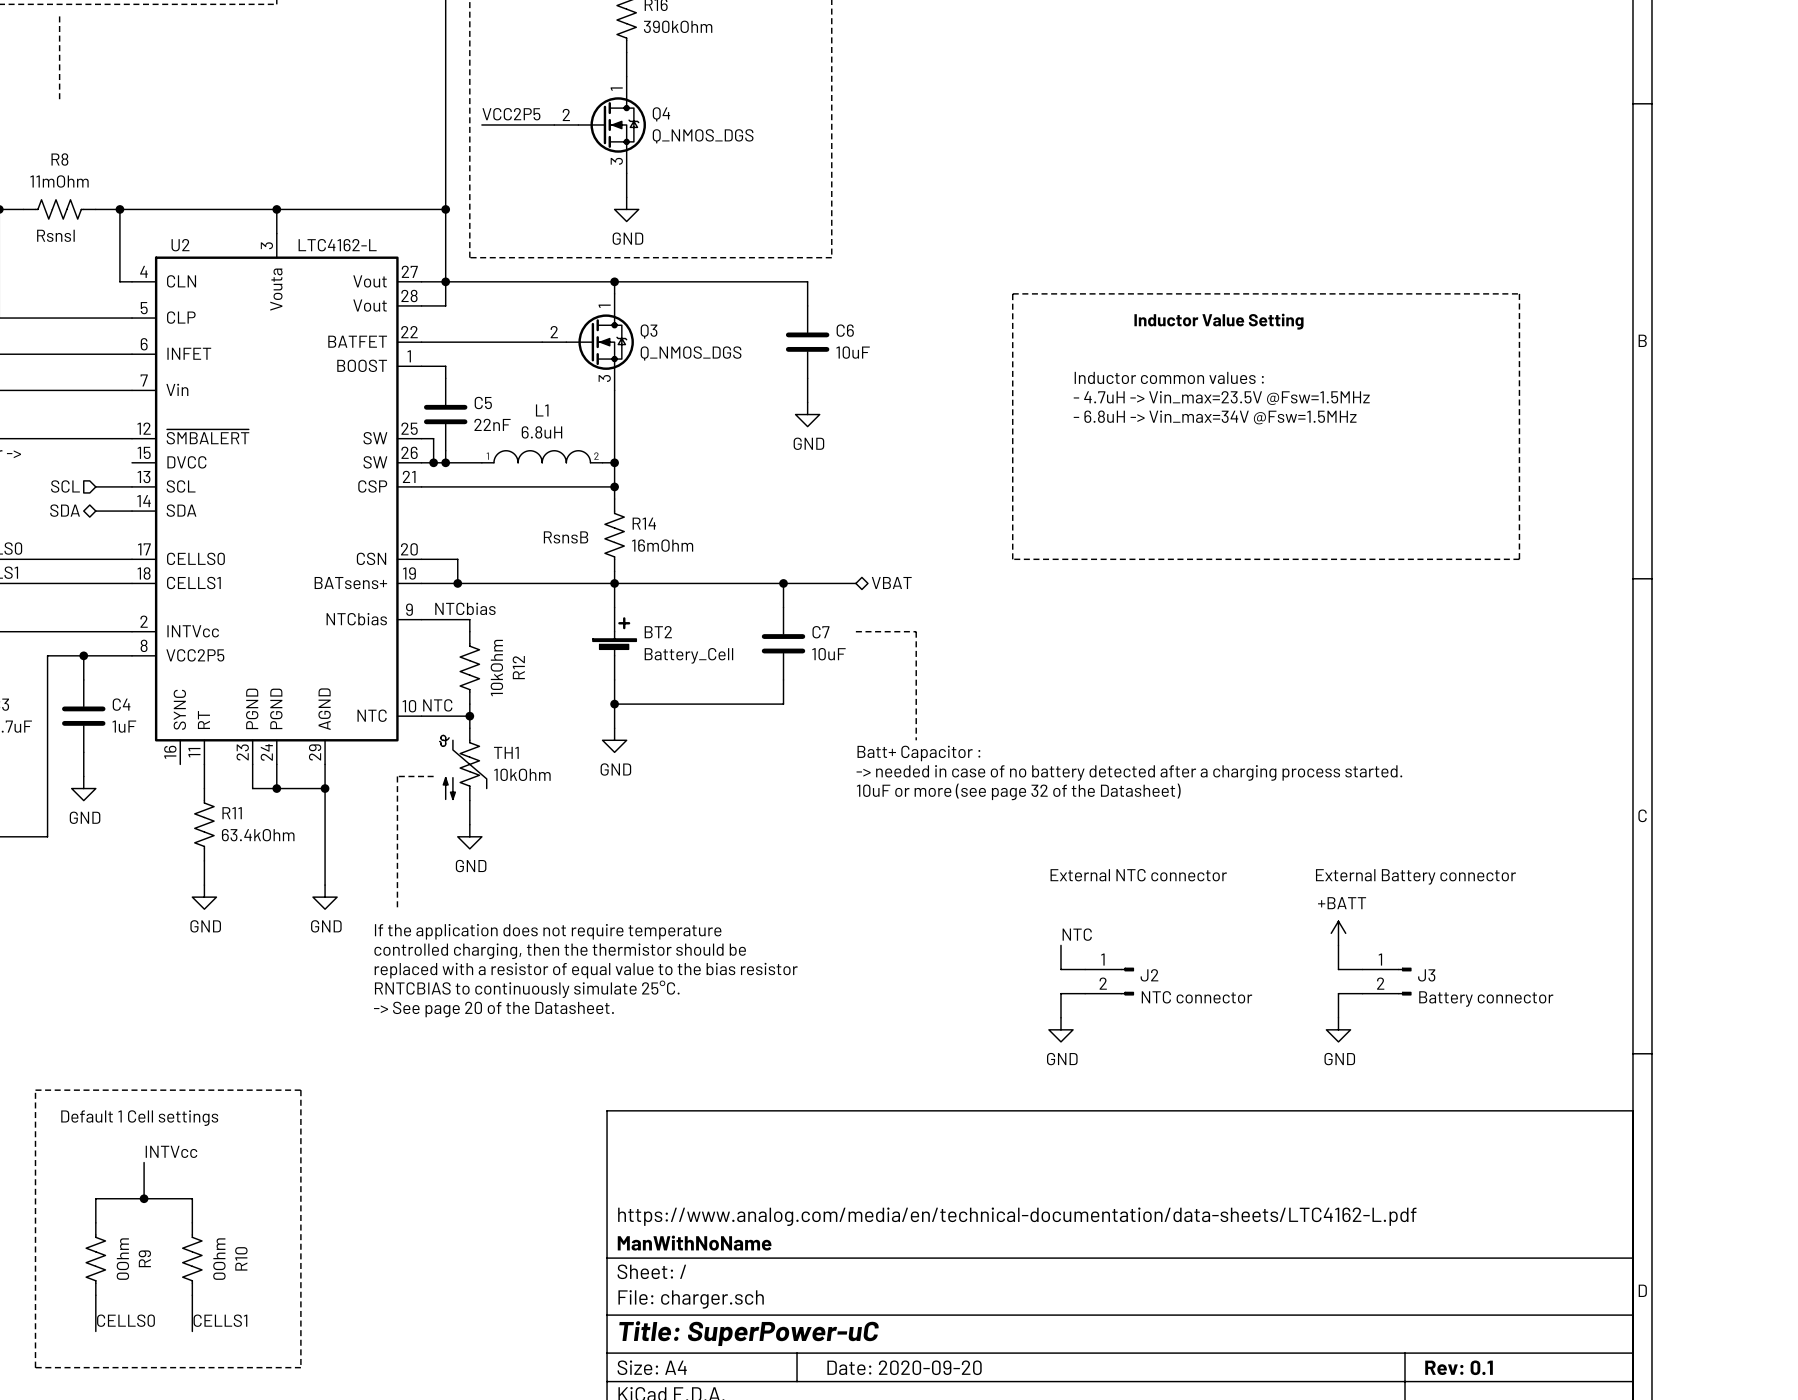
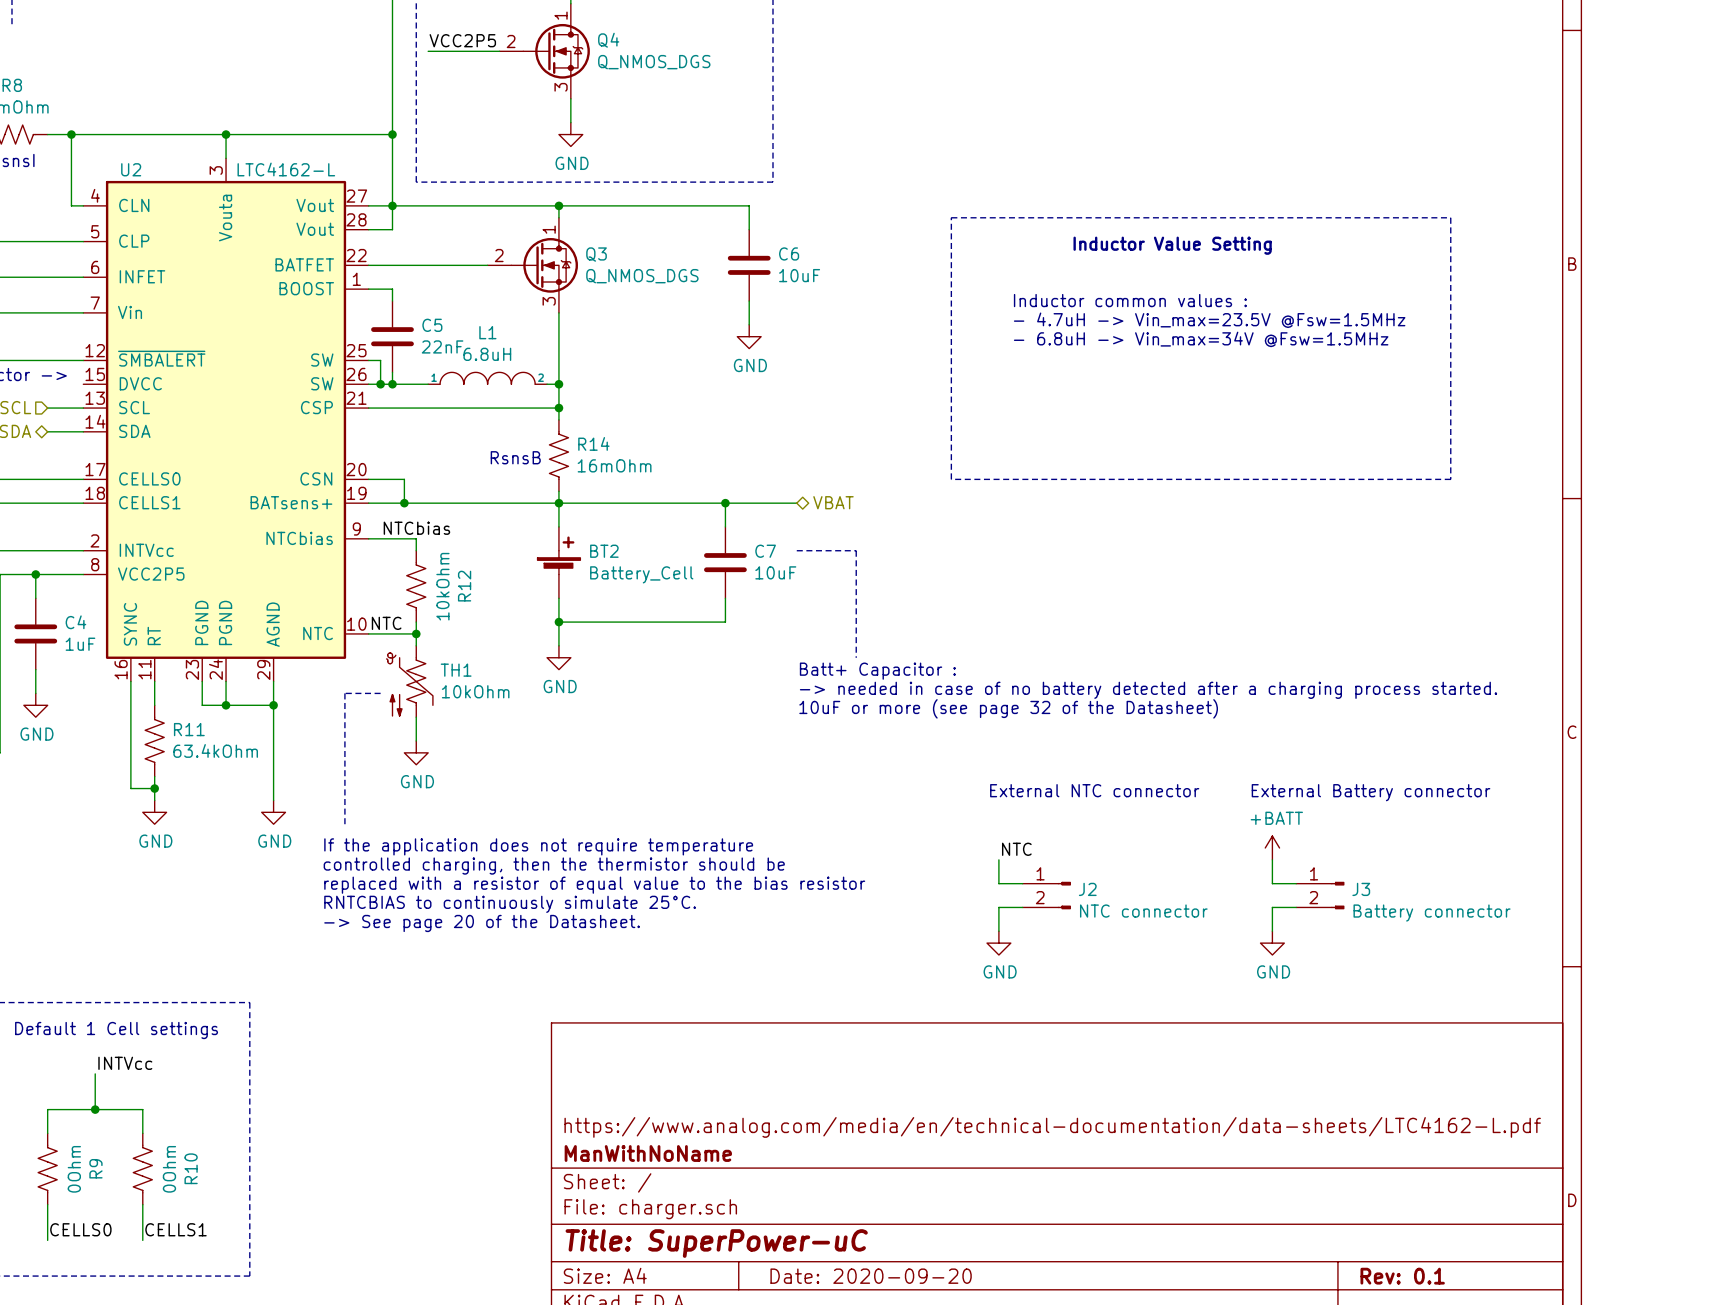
wire: none -> (130, 681) (130, 788) (154, 788)
junction: none -> (154, 788)

